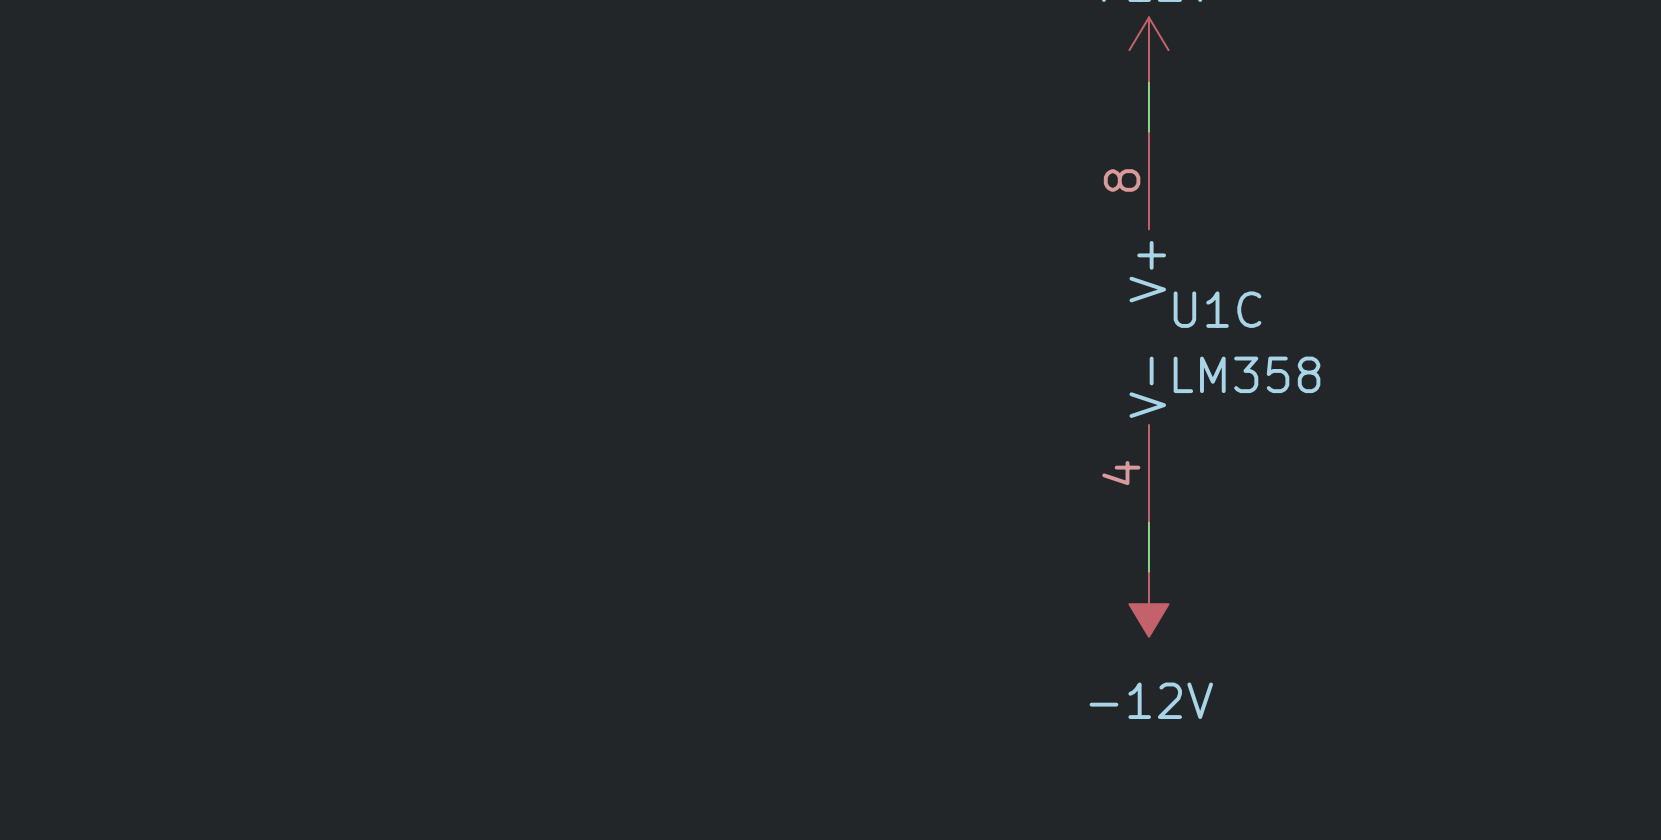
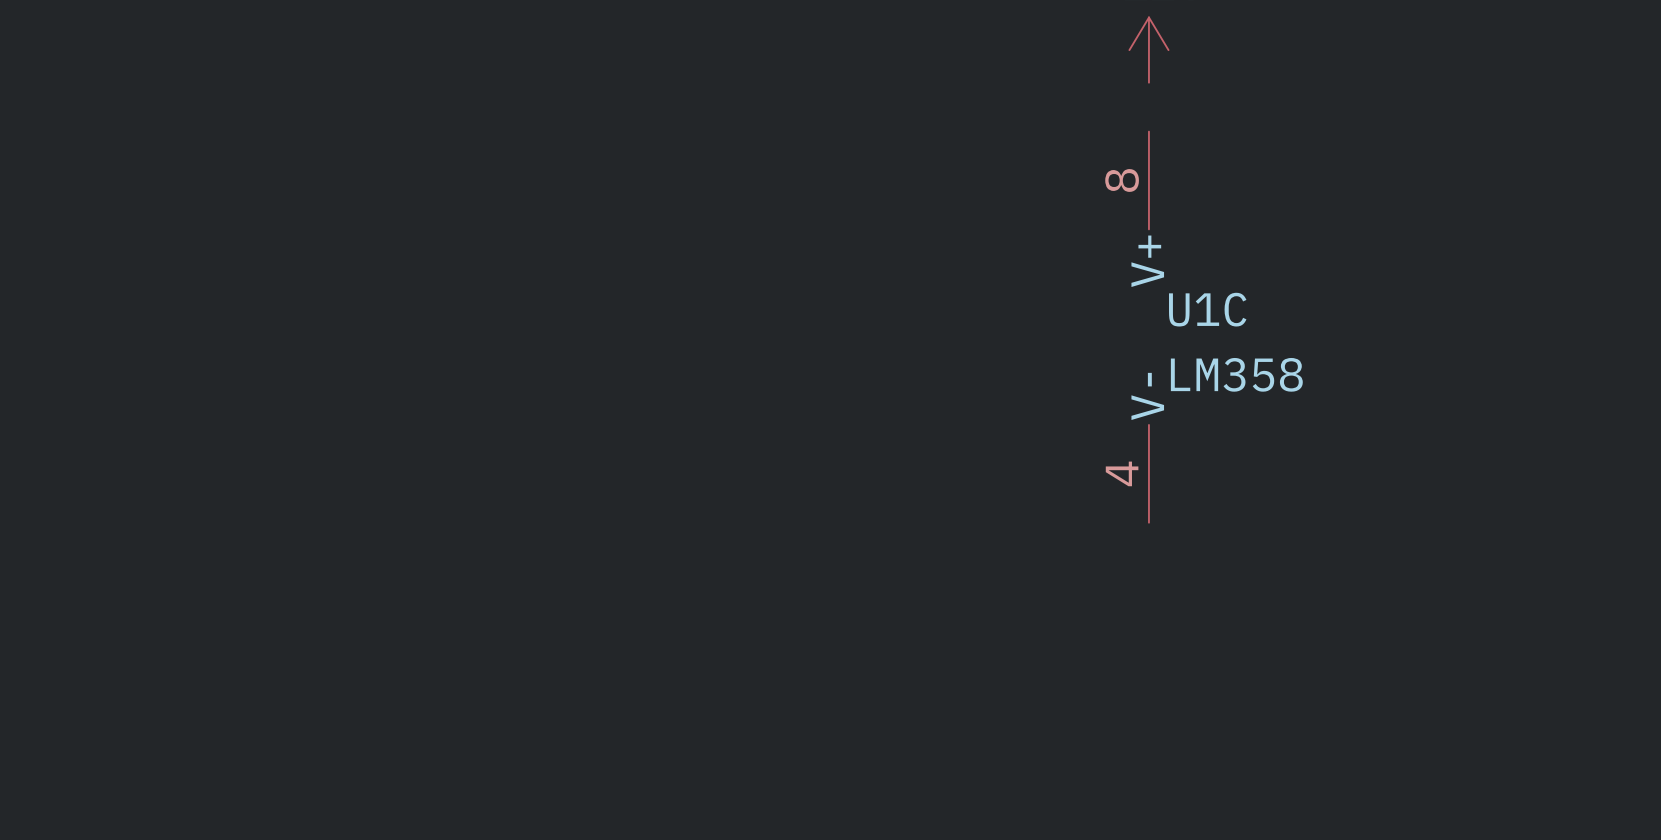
wire: (1148, 82) (1148, 131) -> none
wire: (1148, 522) (1148, 571) -> none
power symbol: -12V (1148, 604) -> none

